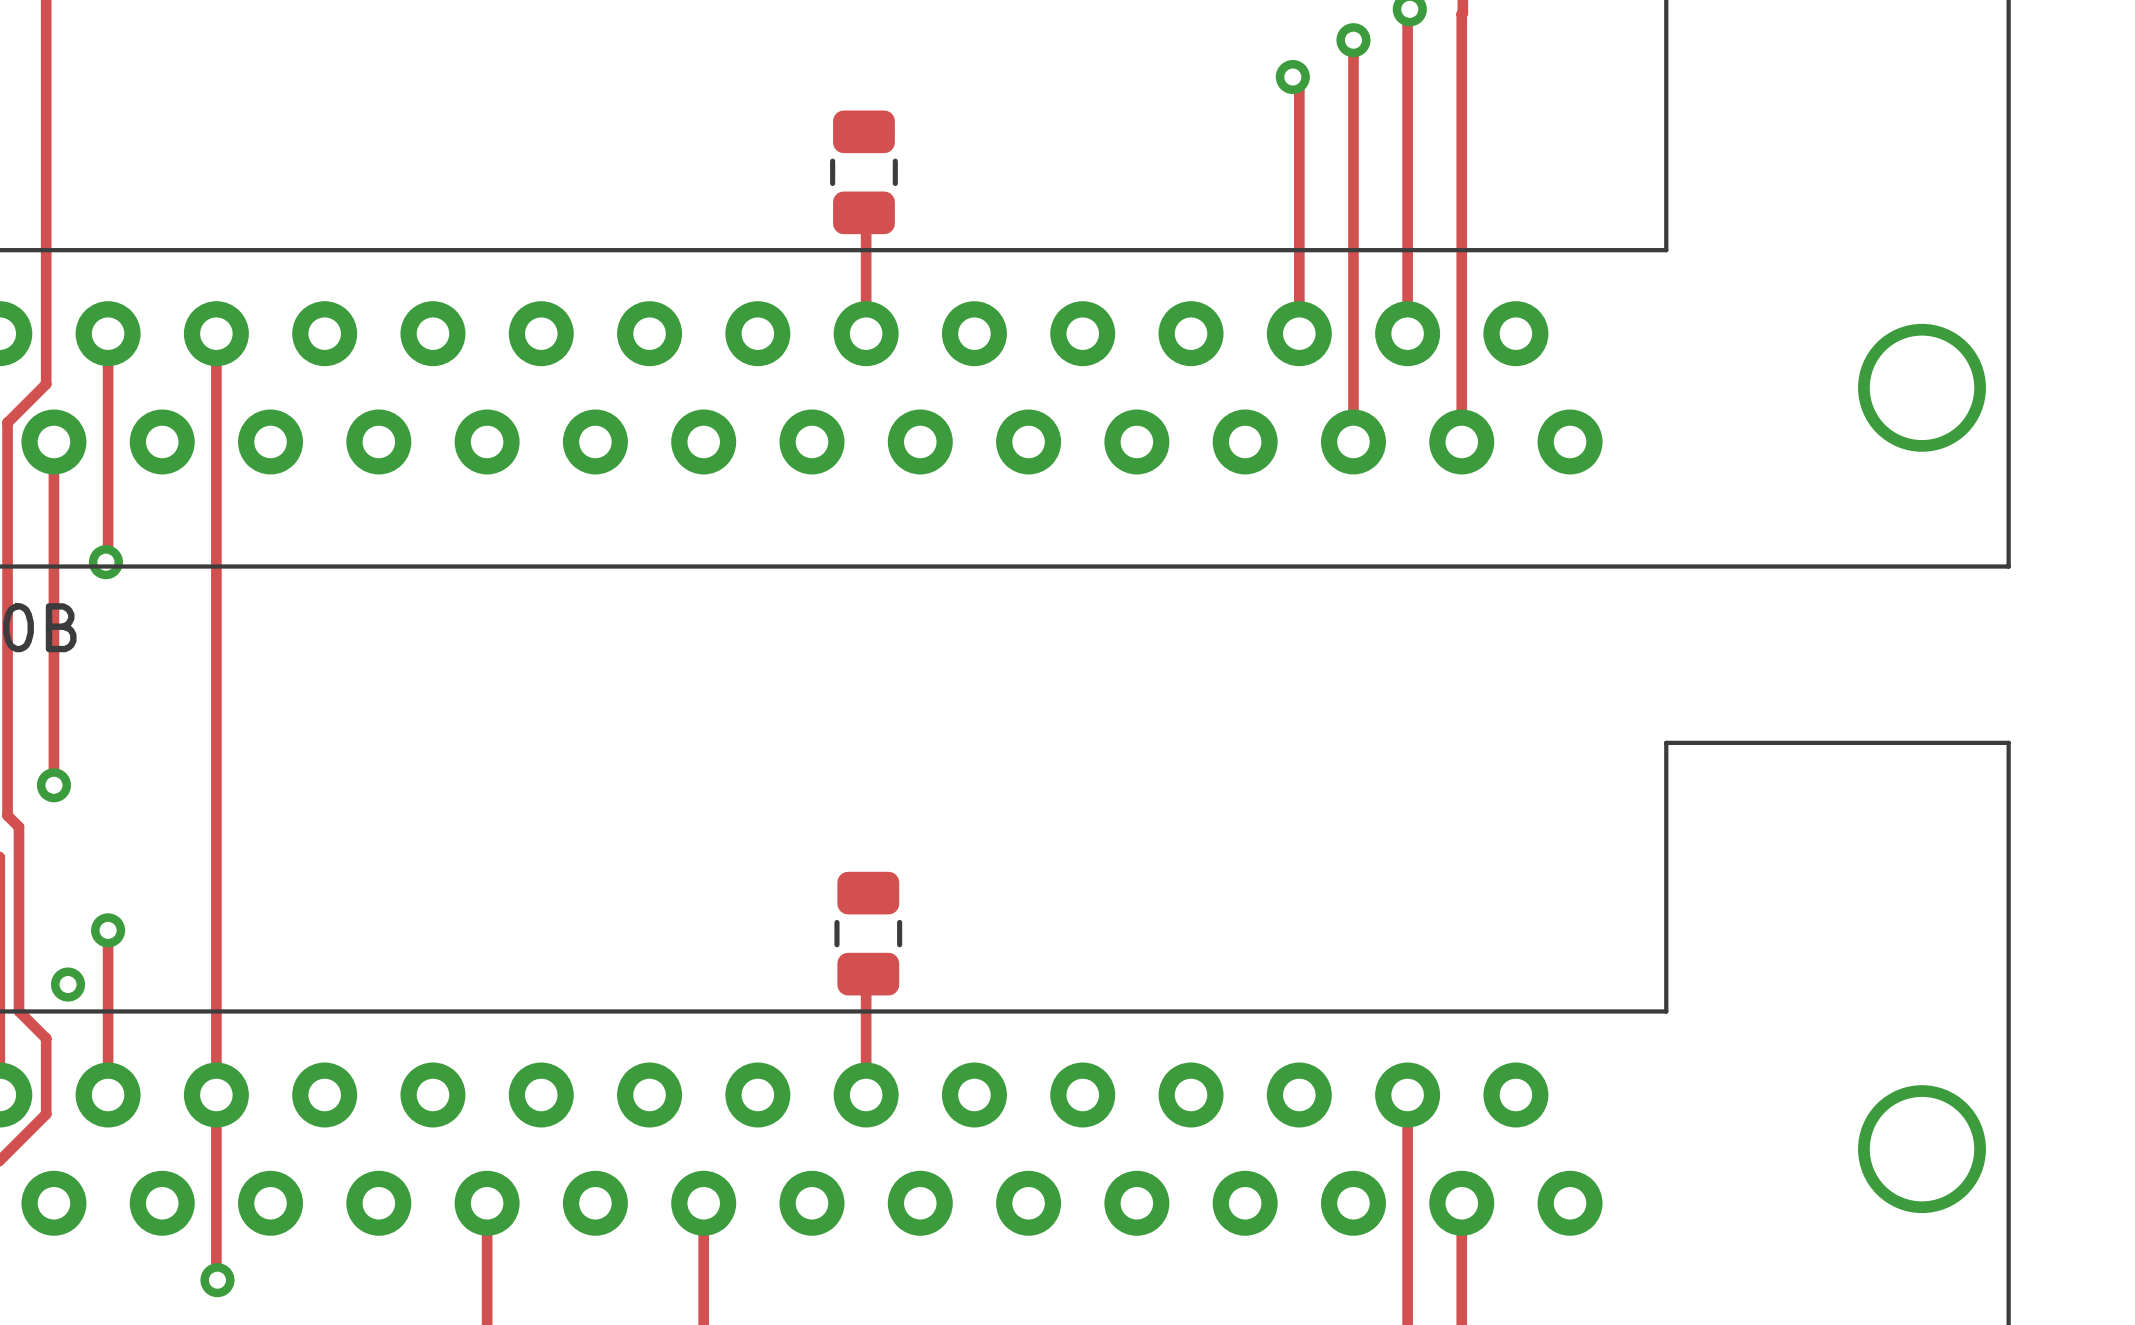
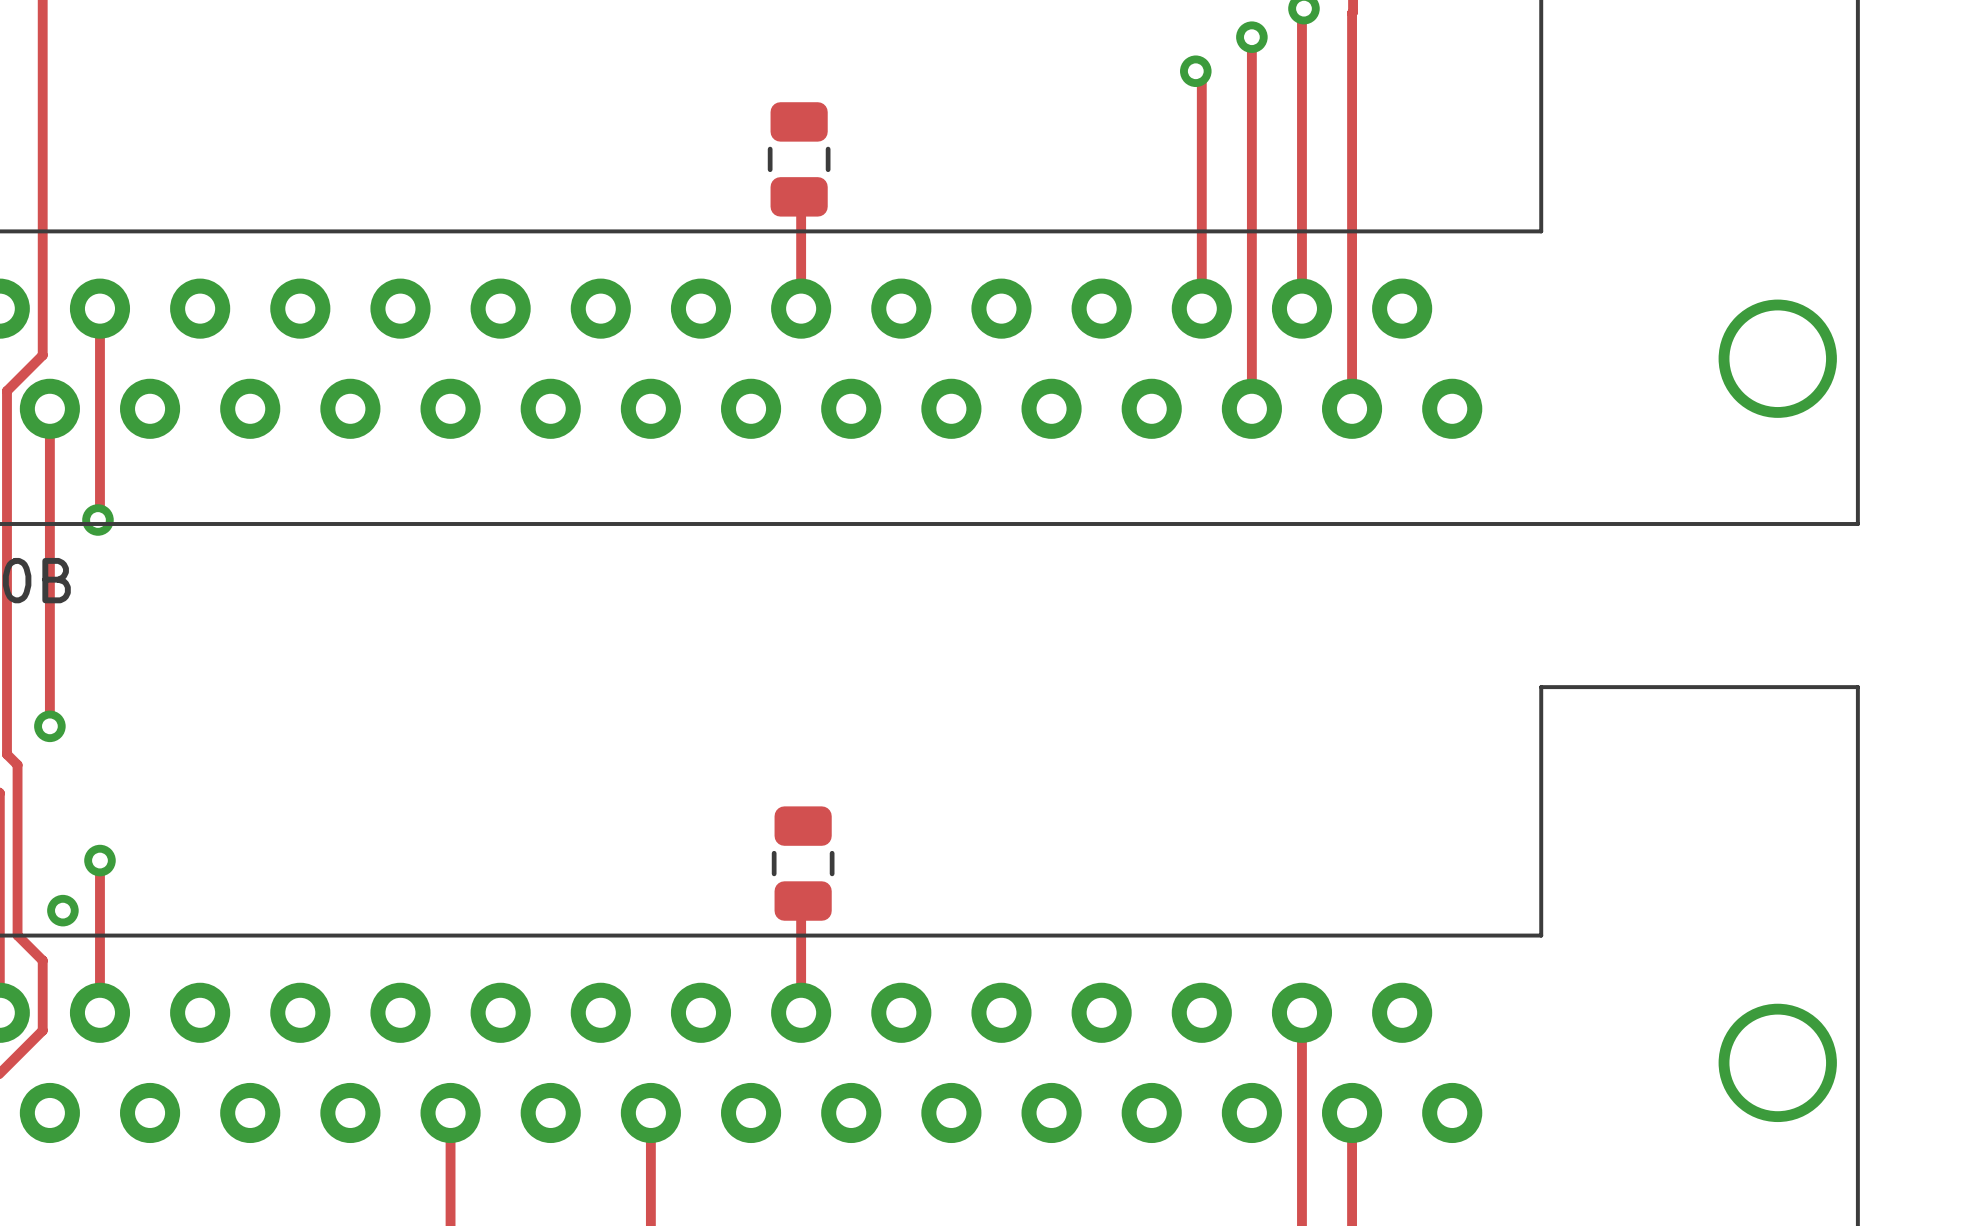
track: (216, 333) (217, 1280) -> none
via: (217, 1280) -> none

